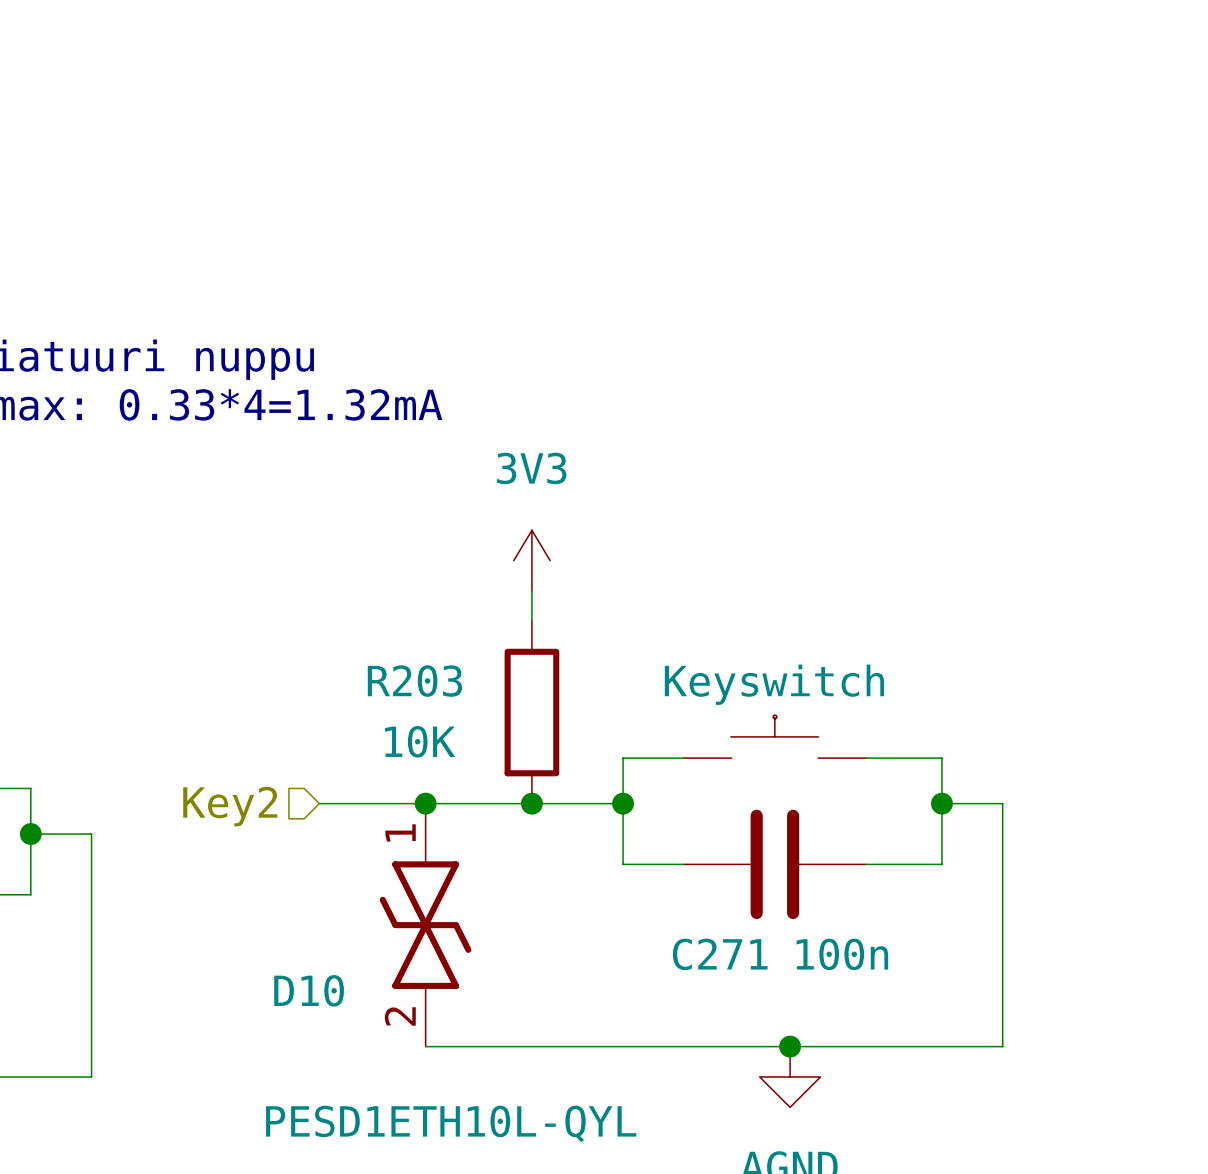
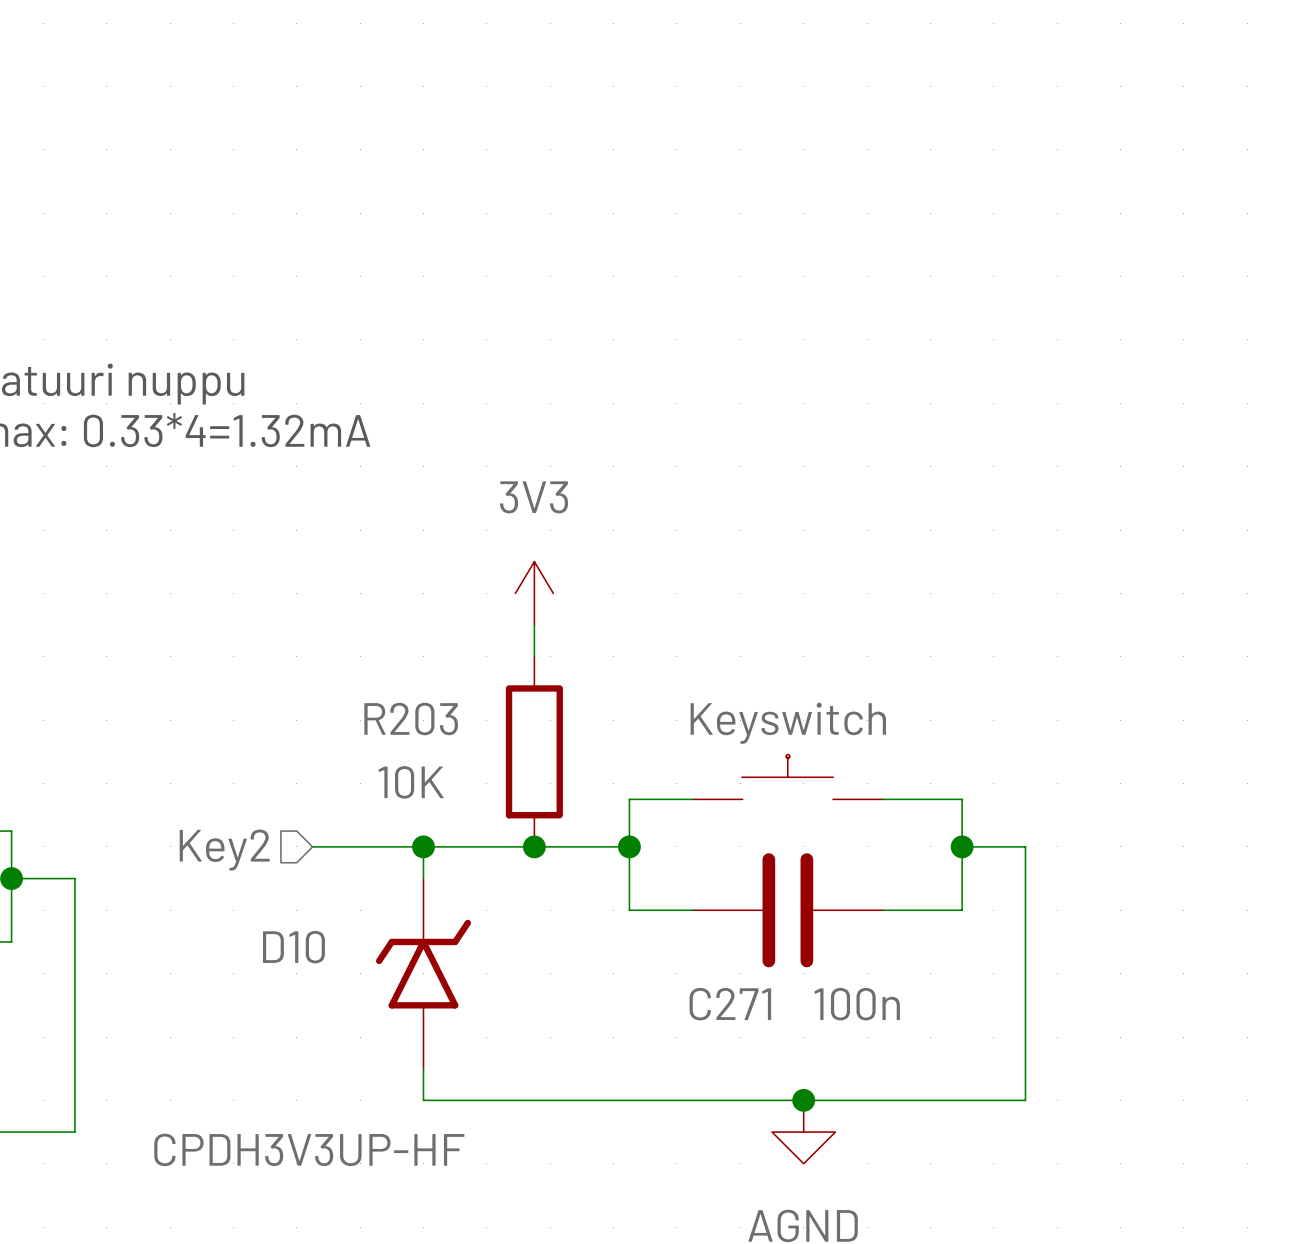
D10 symbol: [379, 803, 472, 1047] -> [375, 878, 472, 1069]
D10 name position: D10 (309, 990) -> D10 (293, 947)
D10 value: PESD1ETH10L-QYL (451, 1123) -> CPDH3V3UP-HF (309, 1149)

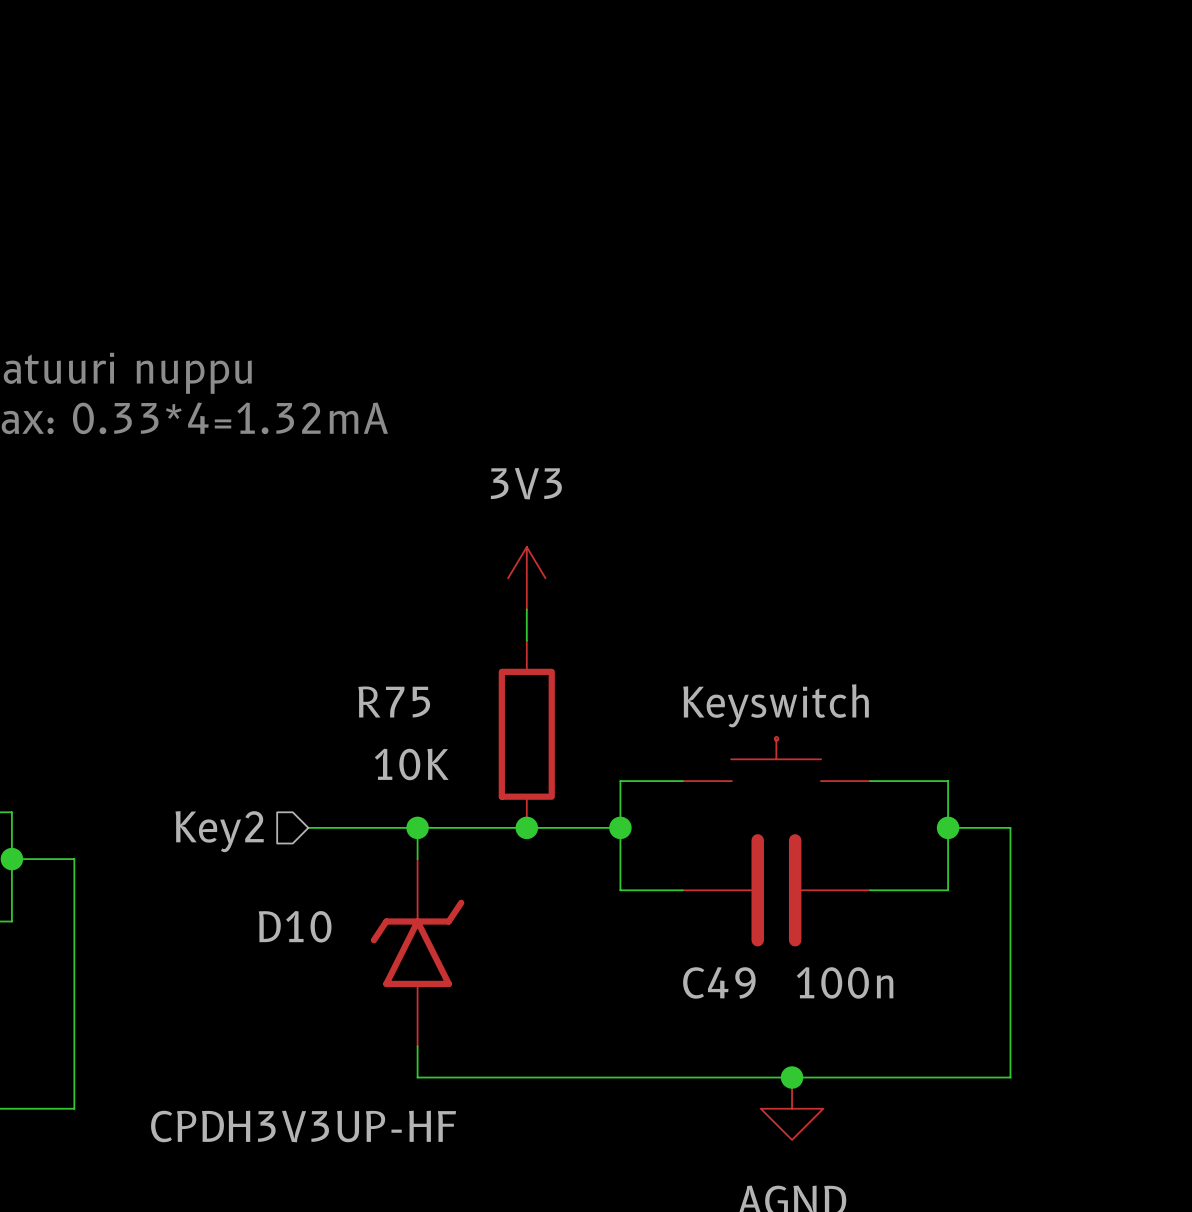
R203 name: R203 (411, 719) -> R75 (394, 701)
C271 name: C271 (730, 1004) -> C49 (719, 982)

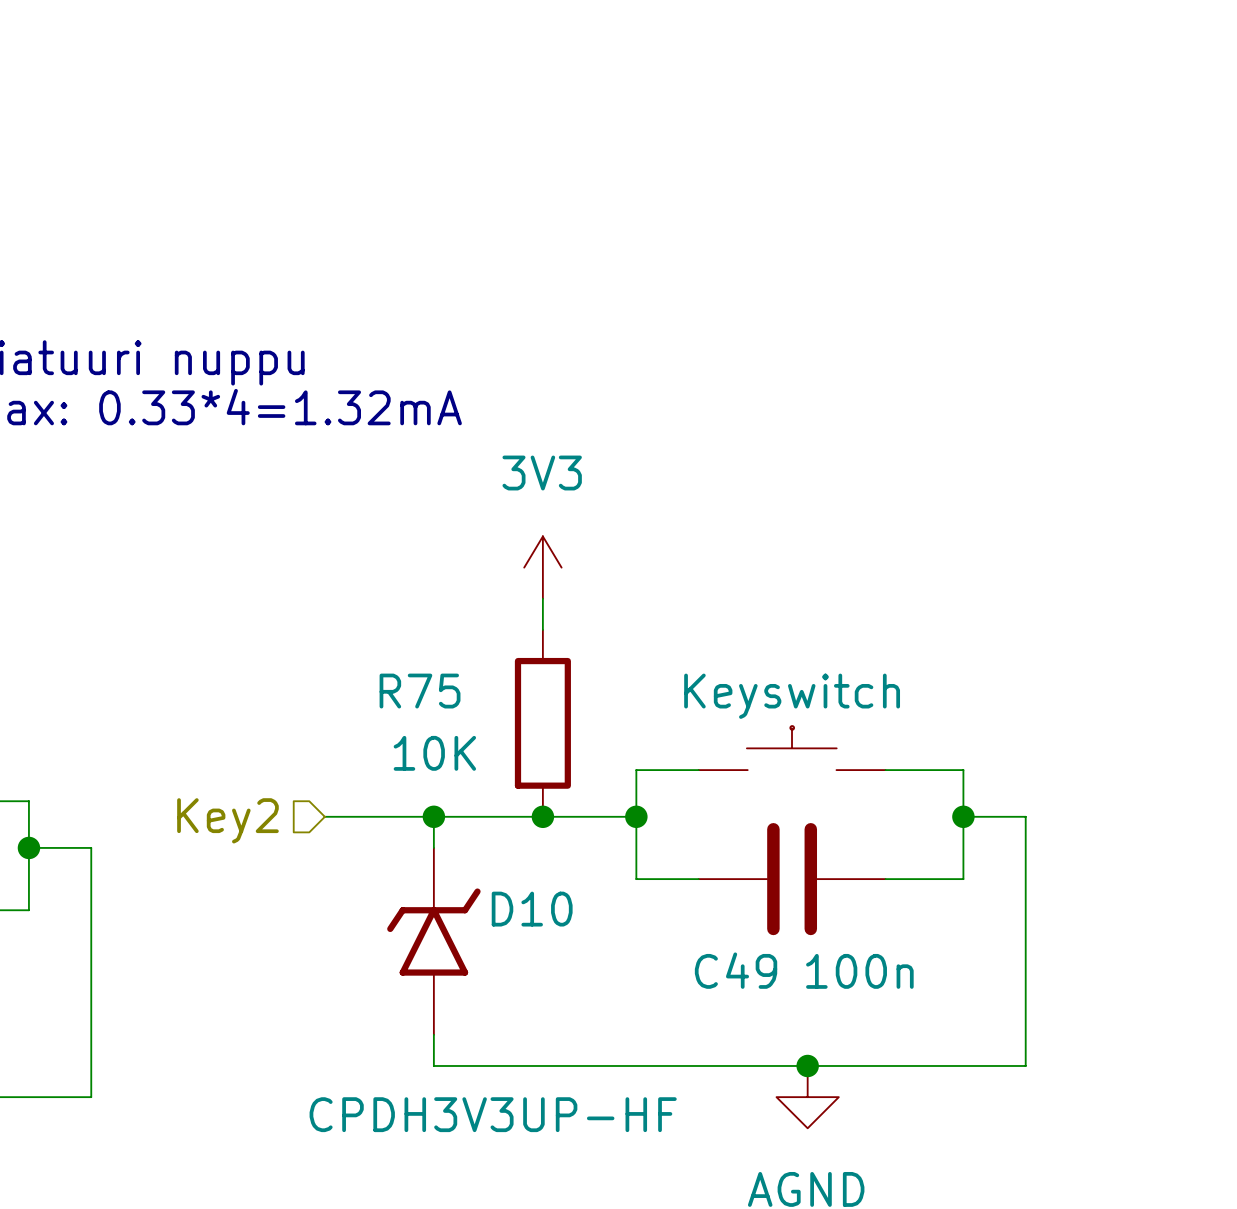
D10 name position: D10 (295, 926) -> D10 (532, 909)
D10 value position: CPDH3V3UP-HF (303, 1126) -> CPDH3V3UP-HF (493, 1114)

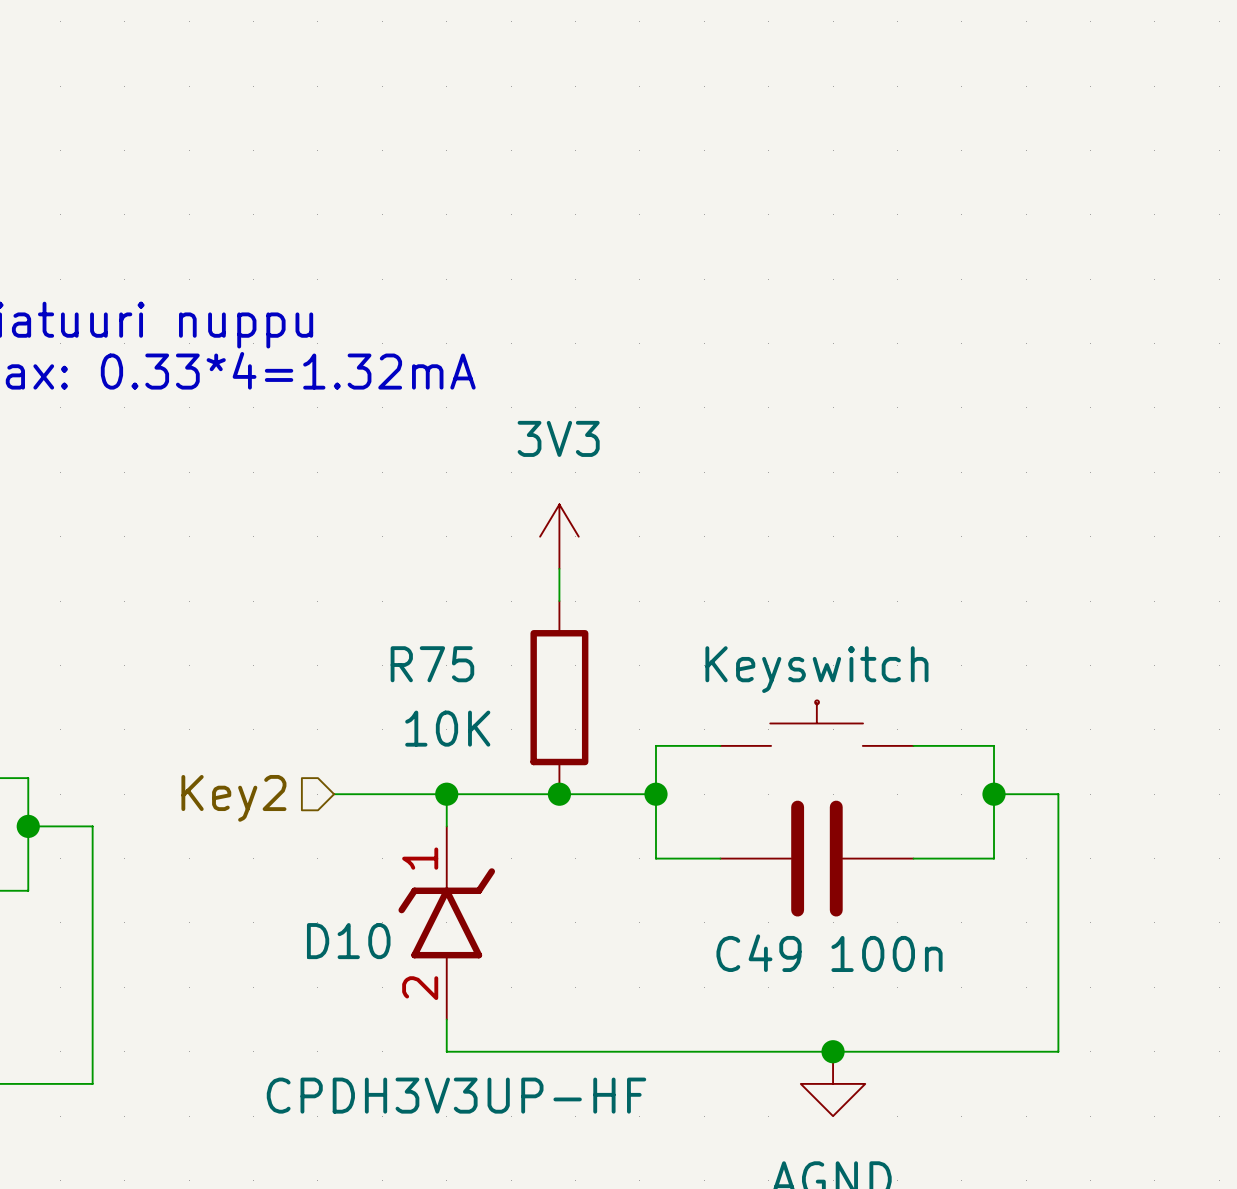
D10 pin number: none -> 1 (420, 858)
D10 name position: D10 (532, 909) -> D10 (348, 941)
D10 pin number: none -> 2 (420, 988)
D10 value position: CPDH3V3UP-HF (493, 1114) -> CPDH3V3UP-HF (456, 1095)

